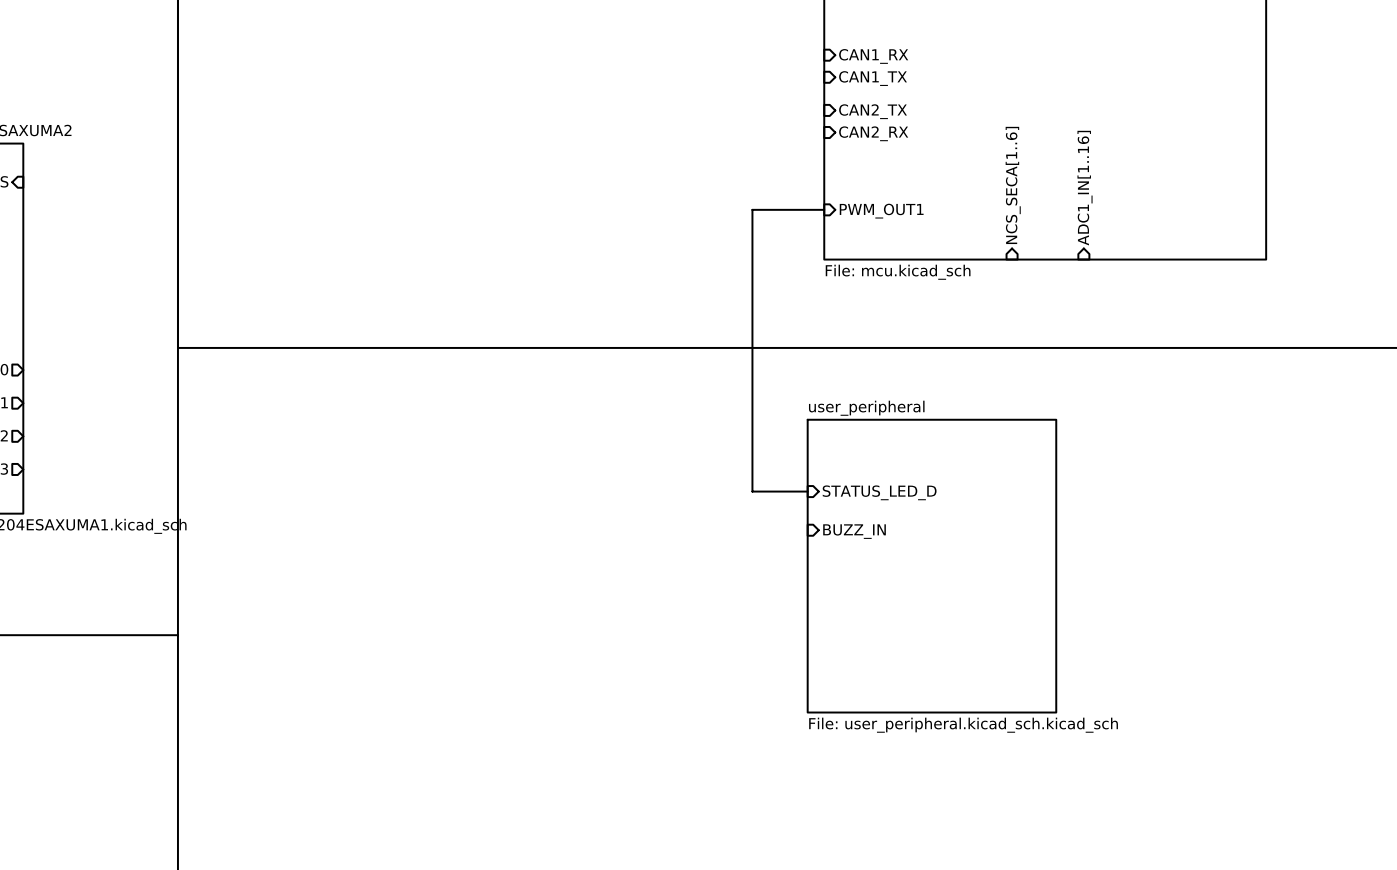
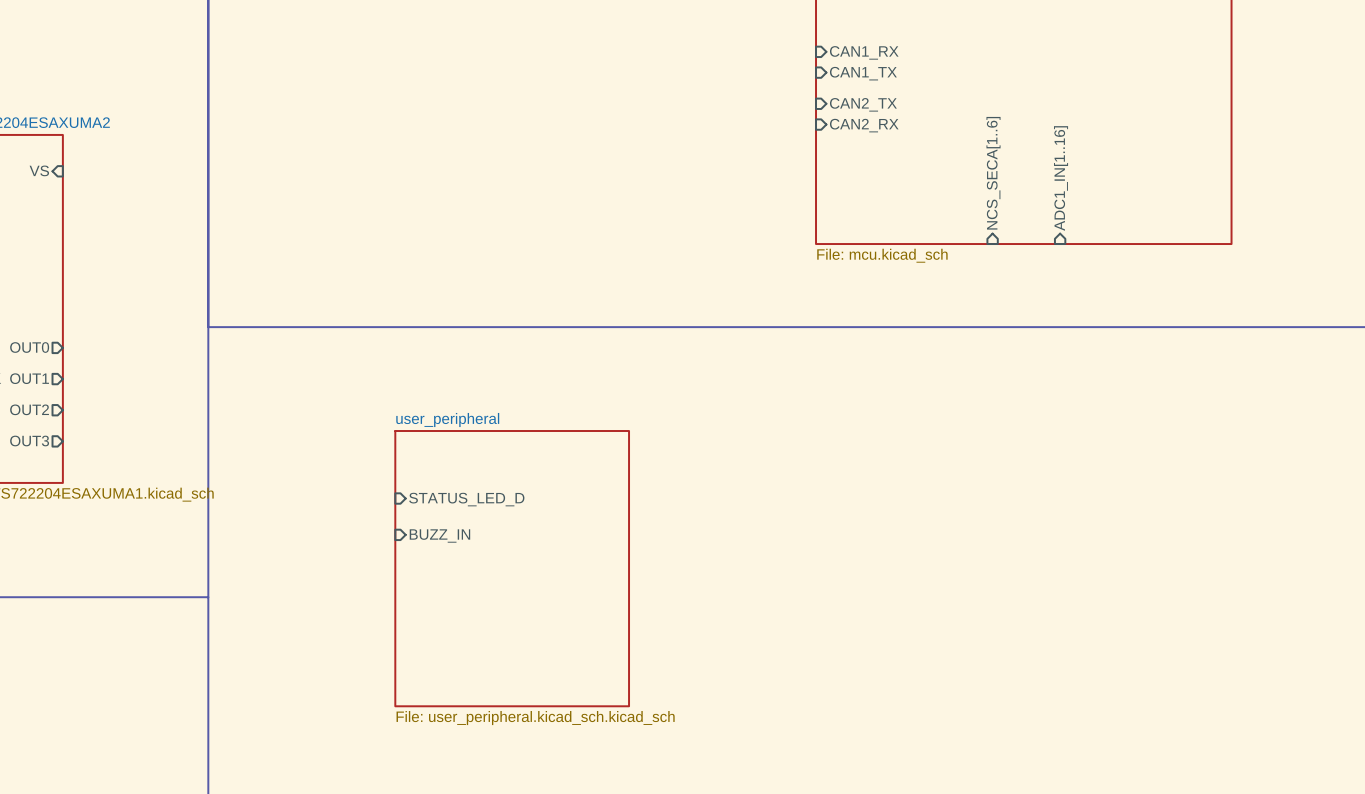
wire: (824, 209) (752, 209) (752, 491) (807, 491) -> none
sheet pin: PWM_OUT1 (881, 211) -> none
sheet pin: STATUS_LED_D (879, 492) -> none
sheet pin: none -> STATUS_LED_D (466, 499)
sheet pin: BUZZ_IN (854, 531) -> none
sheet user_peripheral: File: user_peripheral.kicad_sch.kicad_sch (931, 566) -> none
sheet pin: none -> BUZZ_IN (439, 535)
sheet user_peripheral: none -> File: user_peripheral.kicad_sch.kicad_sch (512, 568)

